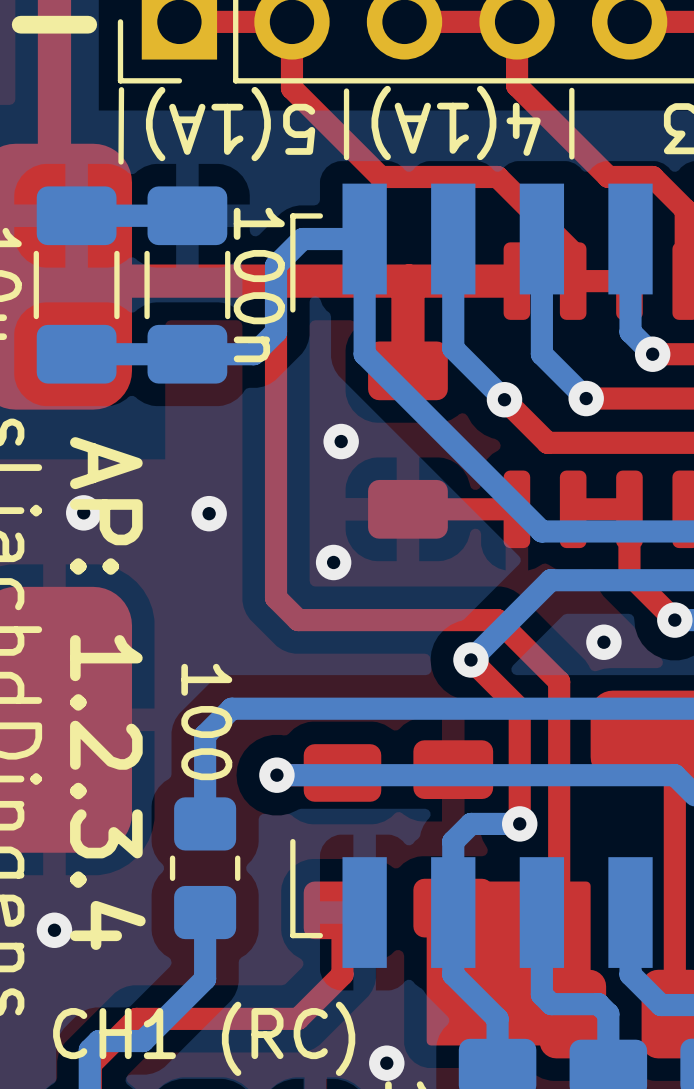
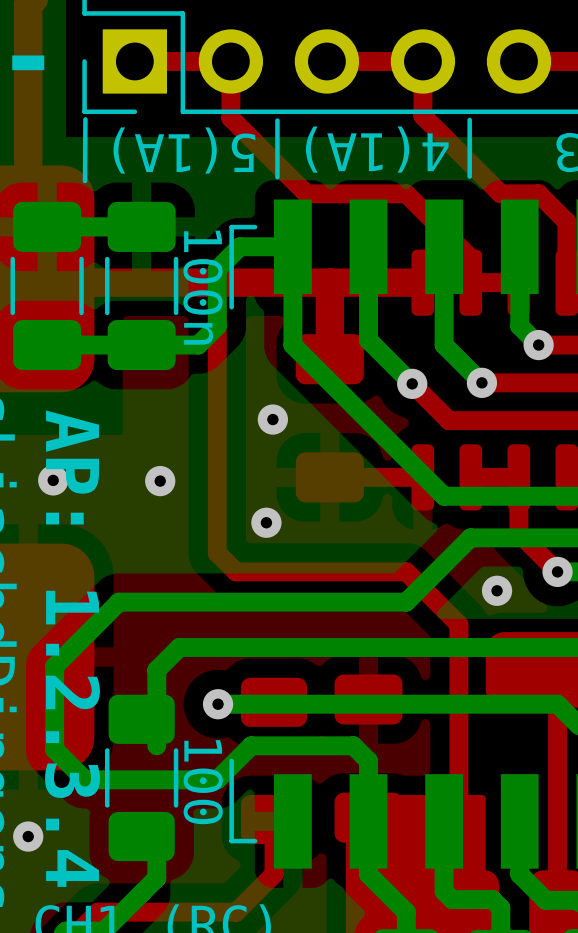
bottom track: (572, 580) (550, 580) (470, 659) -> (470, 537) (406, 602) (118, 602) (54, 666) (54, 749) (84, 779) (217, 779) (251, 745) (353, 745) (368, 760)
top track: (466, 655) (519, 708) (519, 823) -> none
via: (470, 659) -> none
part value position: 100 (206, 722) -> 100 (203, 782)
part footprint: [169, 797, 241, 940] -> [104, 694, 179, 862]
bottom track: (519, 823) (470, 823) (453, 841) -> none
via: (519, 823) -> none

